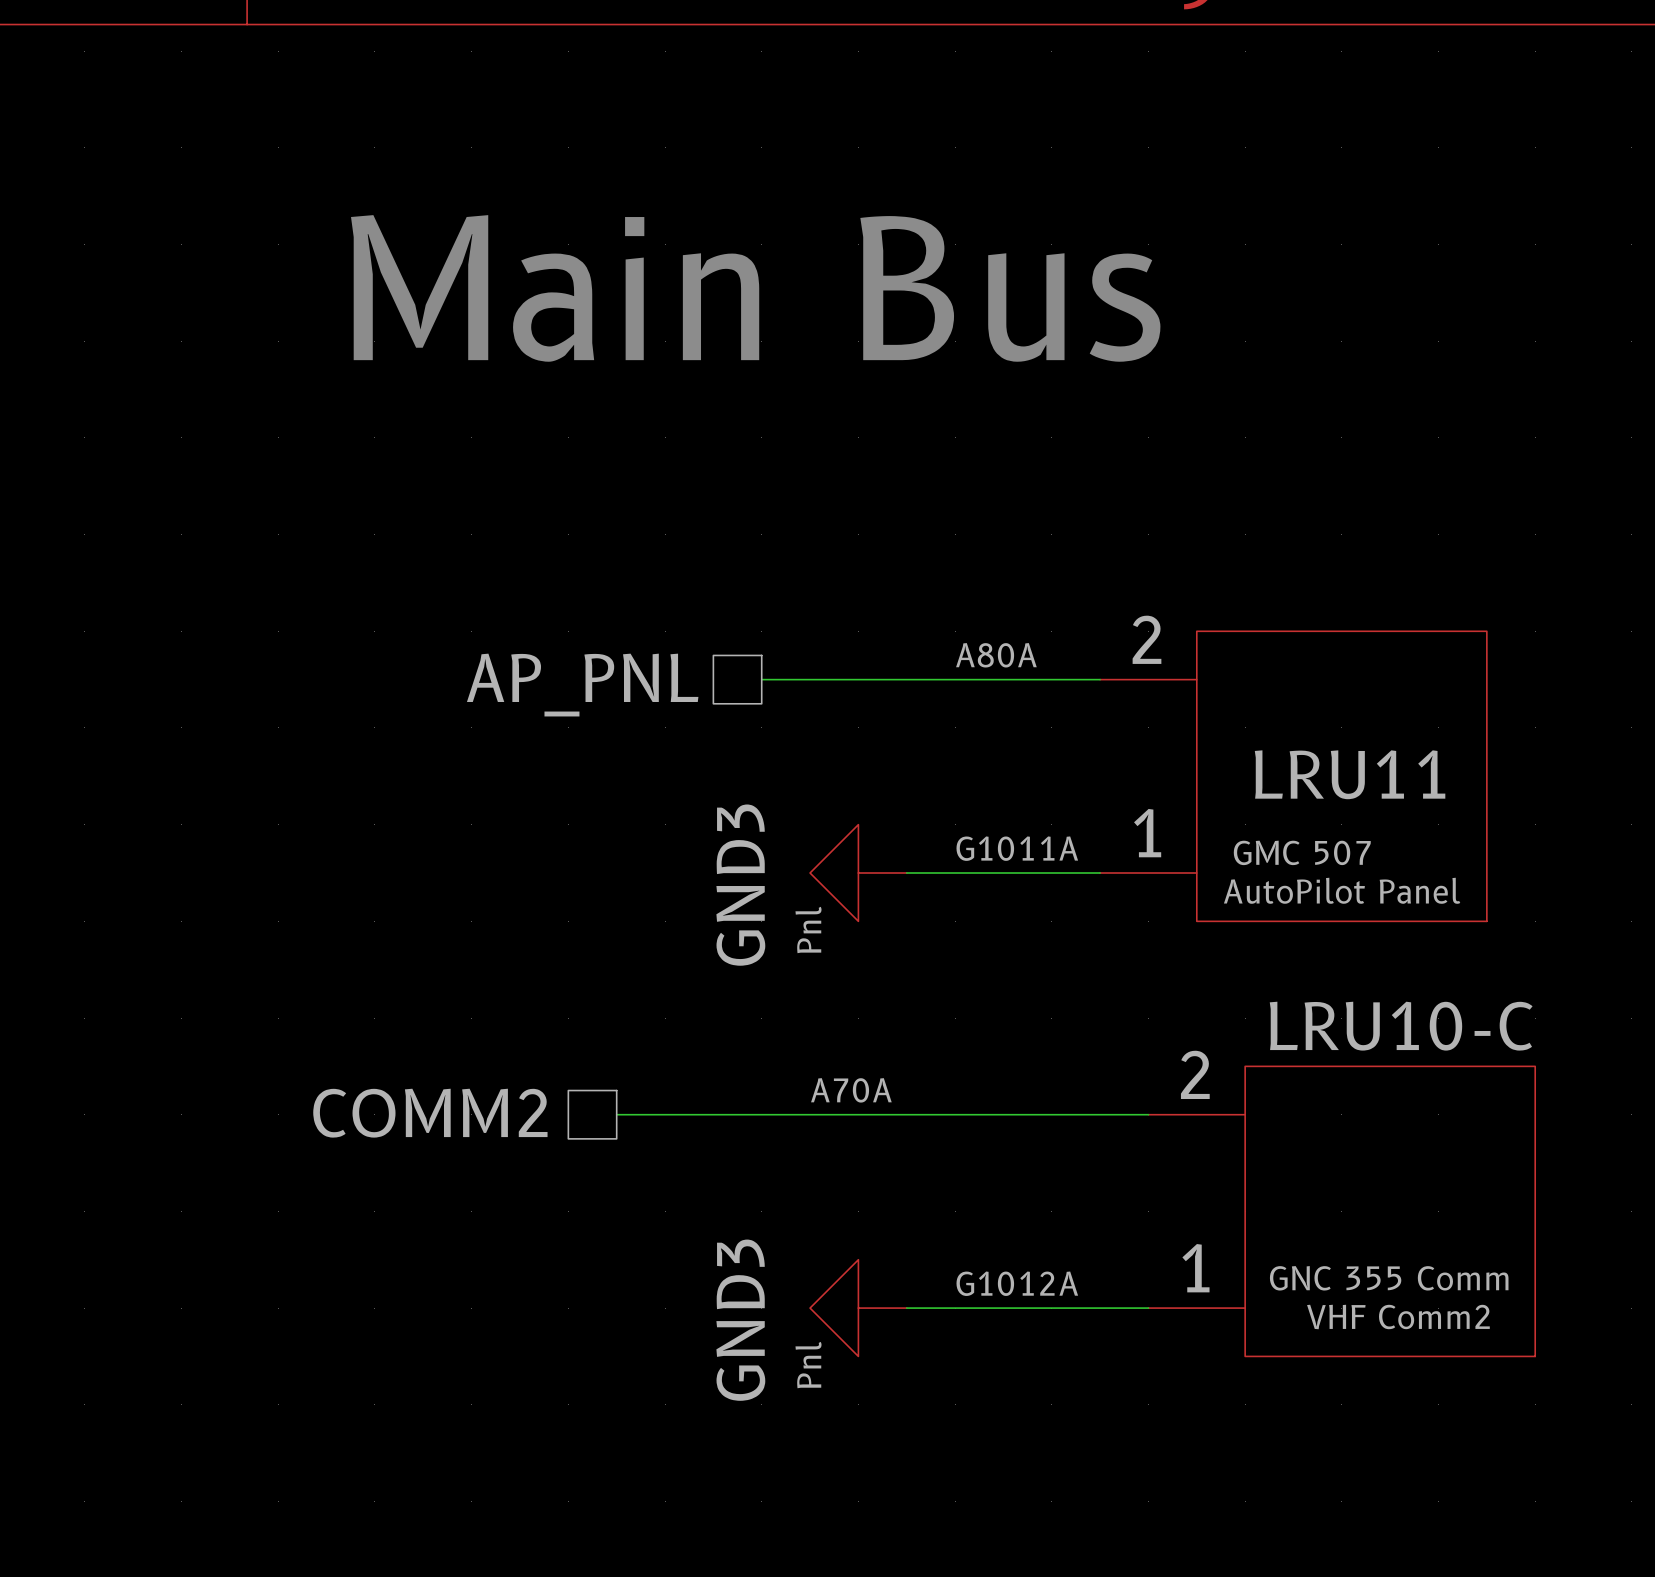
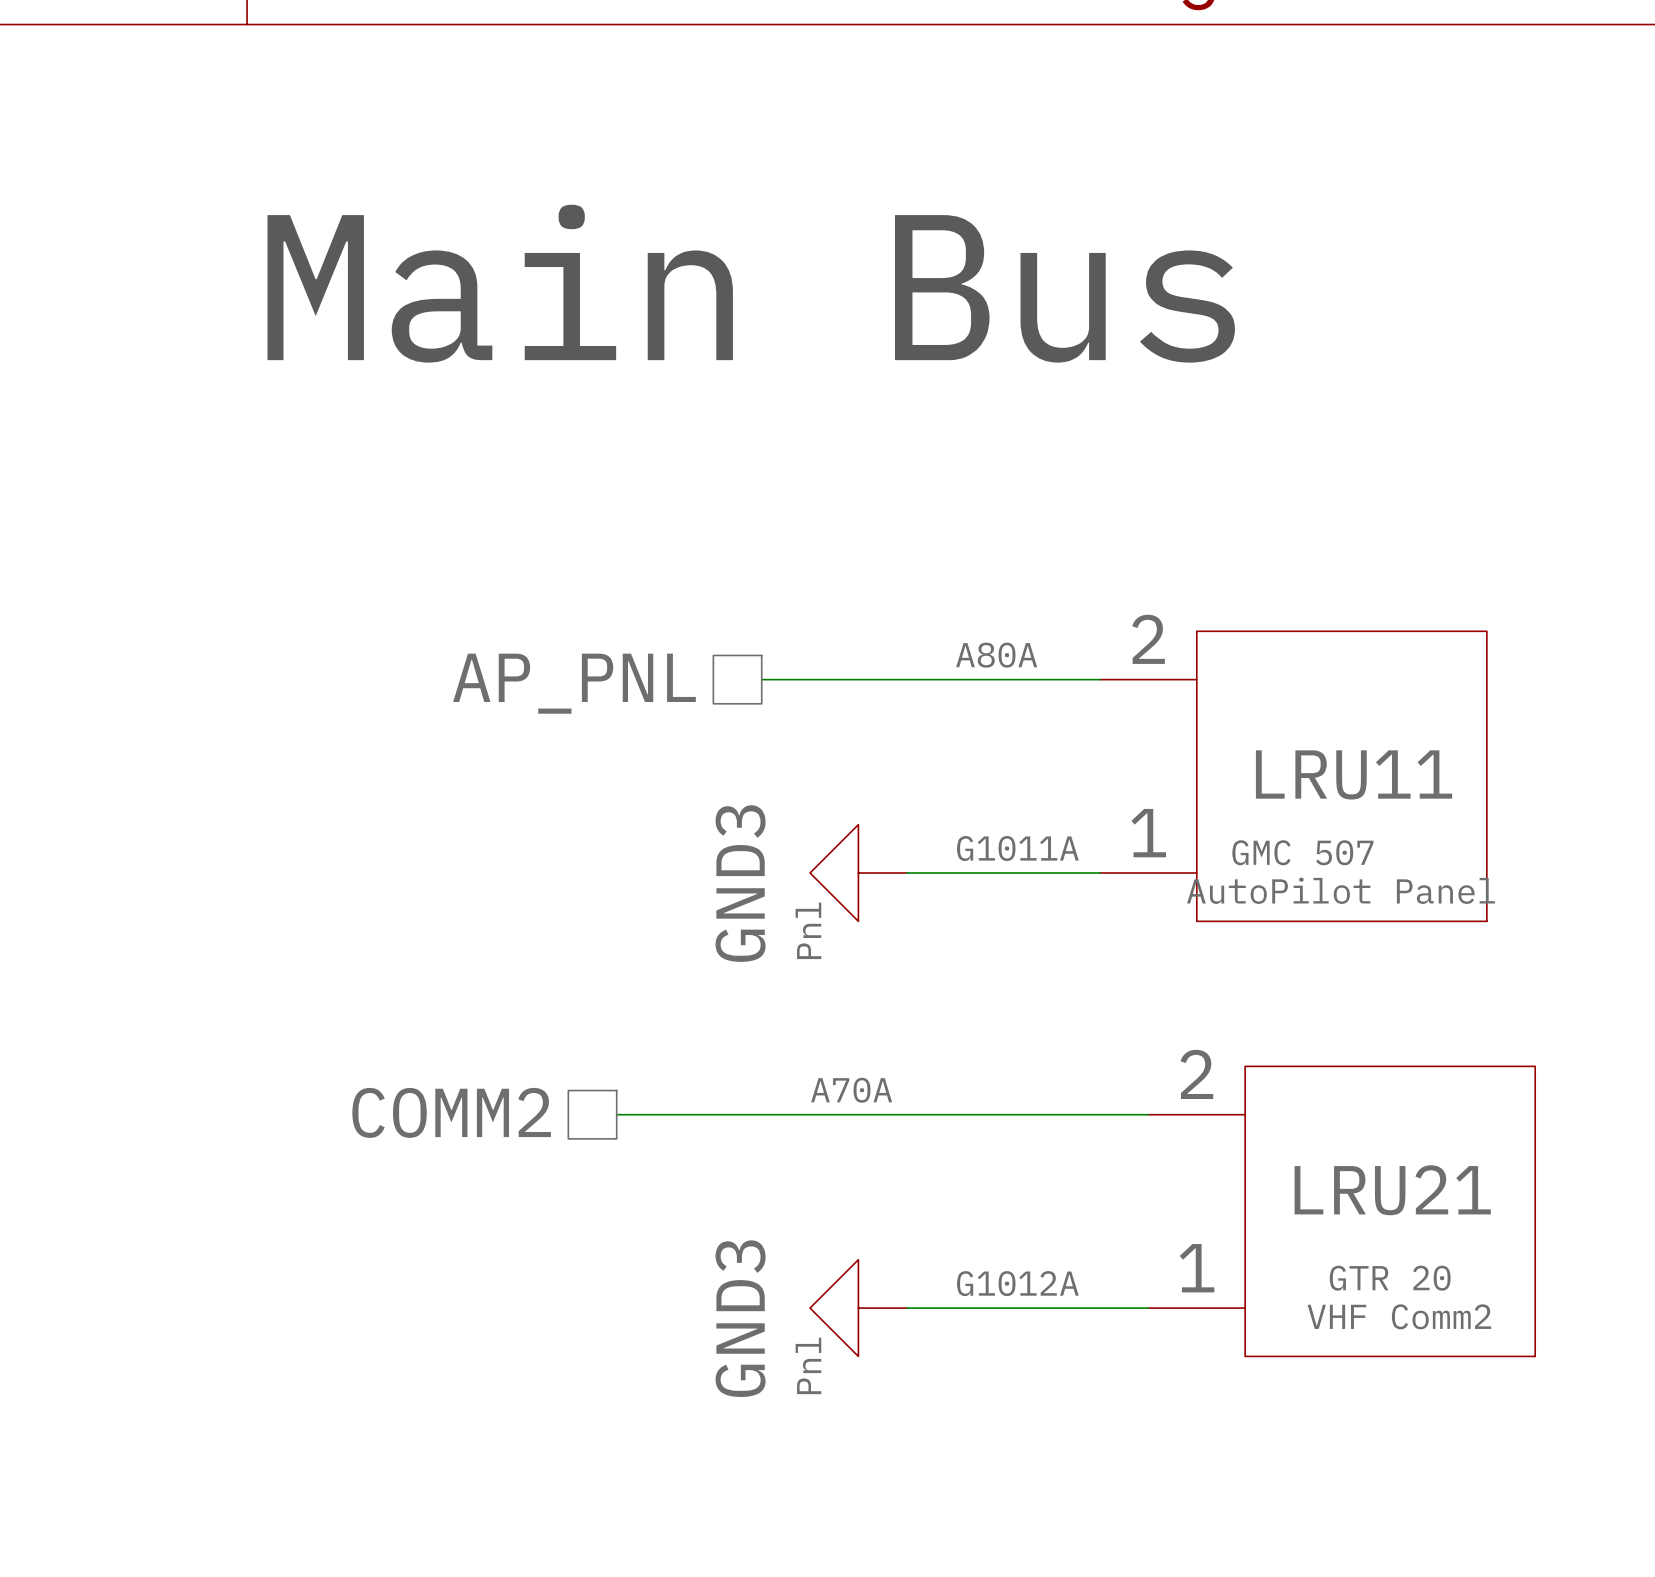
LRU10-C name: LRU10-C (1401, 1026) -> LRU21 (1392, 1190)
LRU10-C text: GNC 355 Comm (1389, 1278) -> GTR 20 (1390, 1278)

